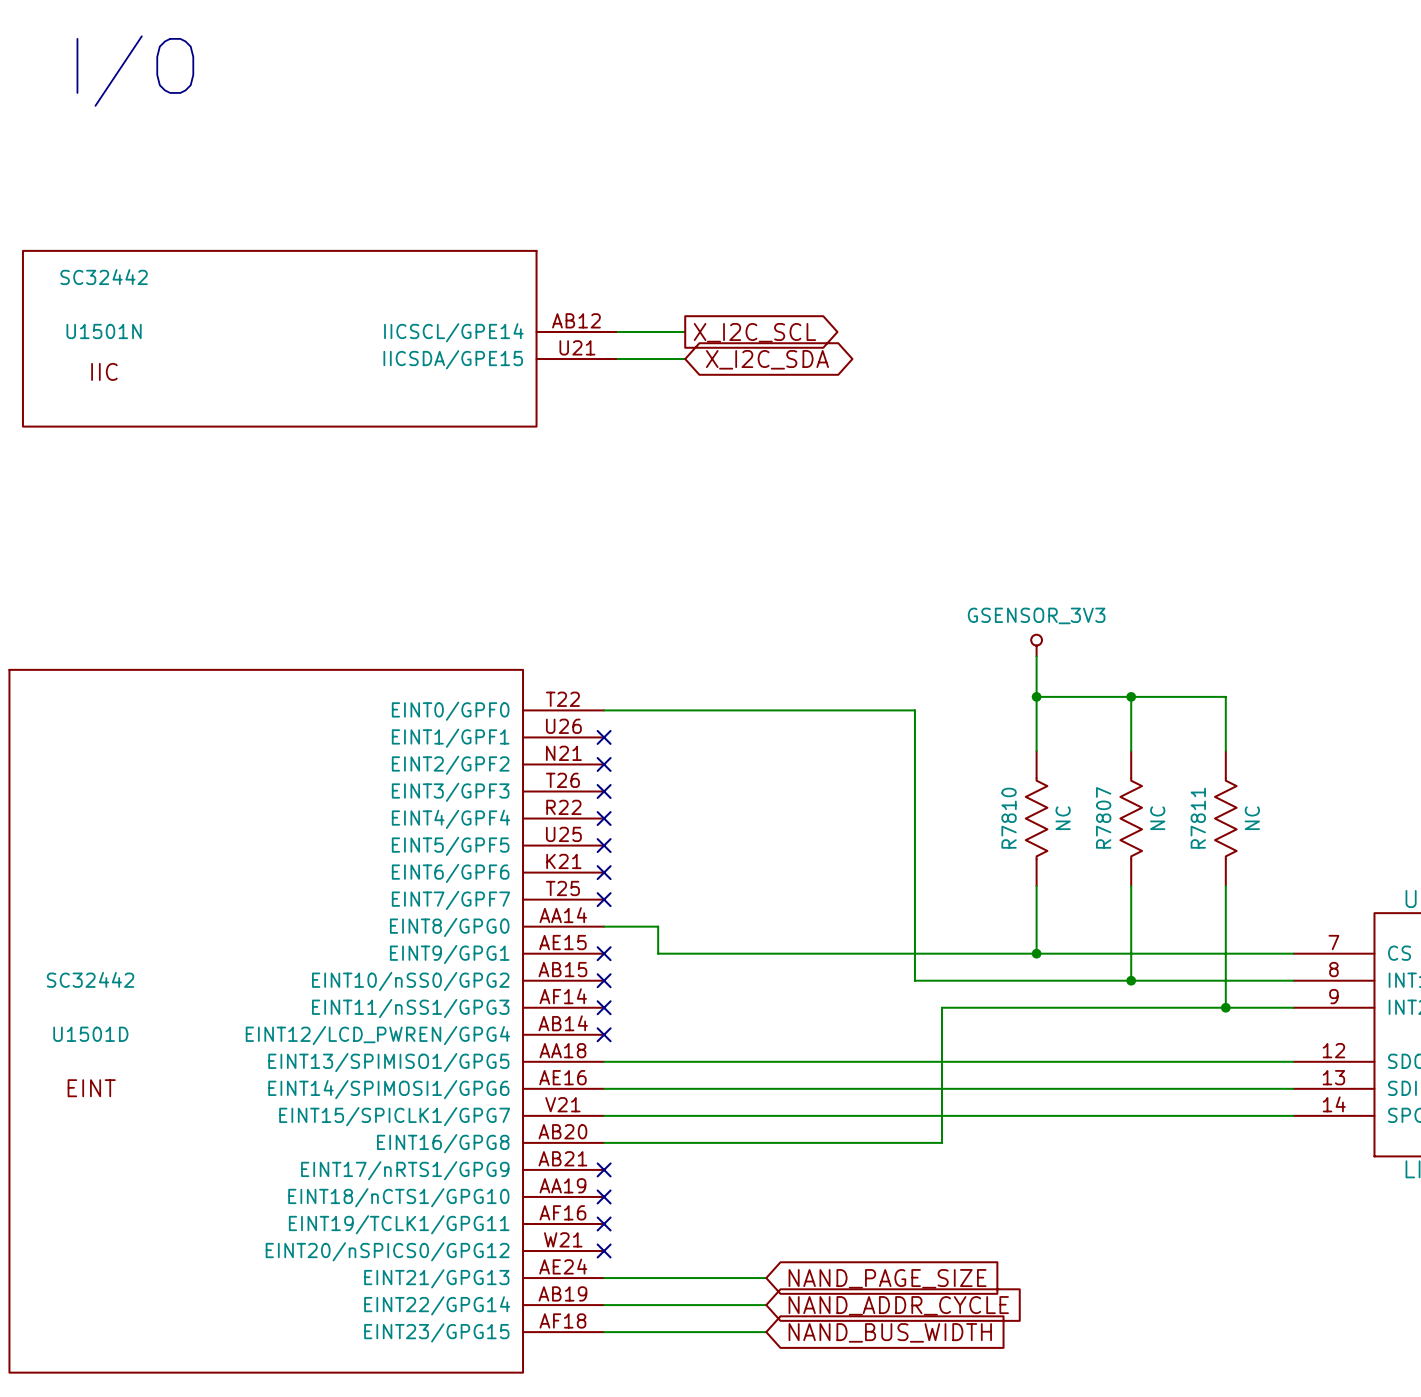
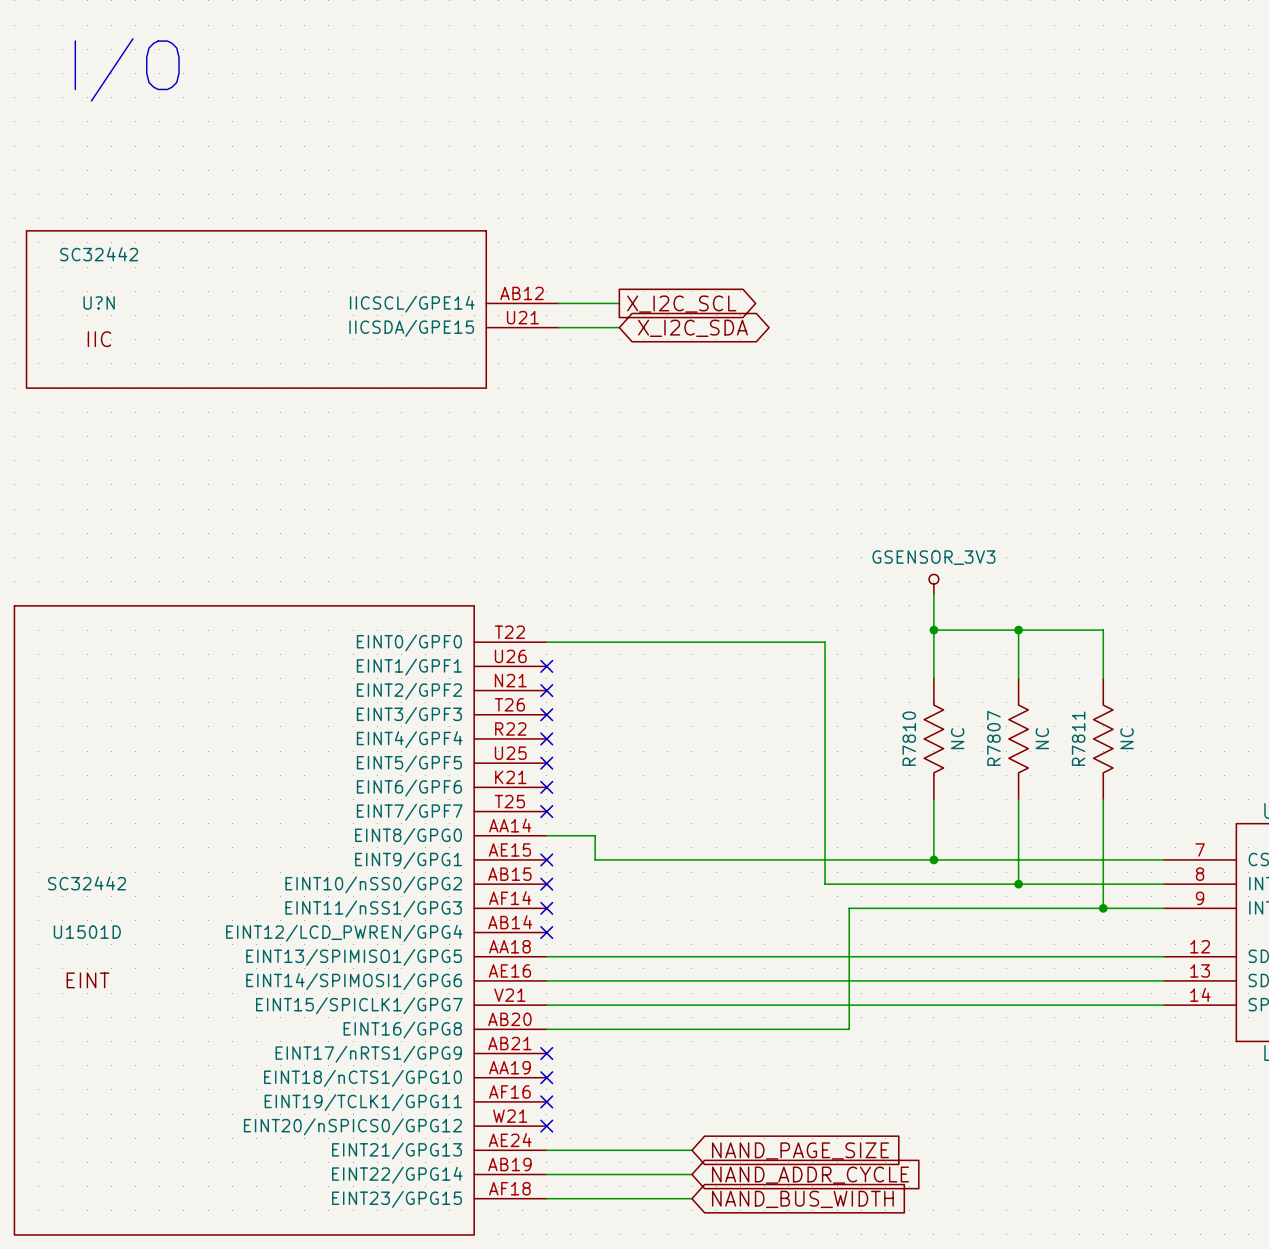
U1501N name: U1501N (104, 331) -> U?N (99, 302)

